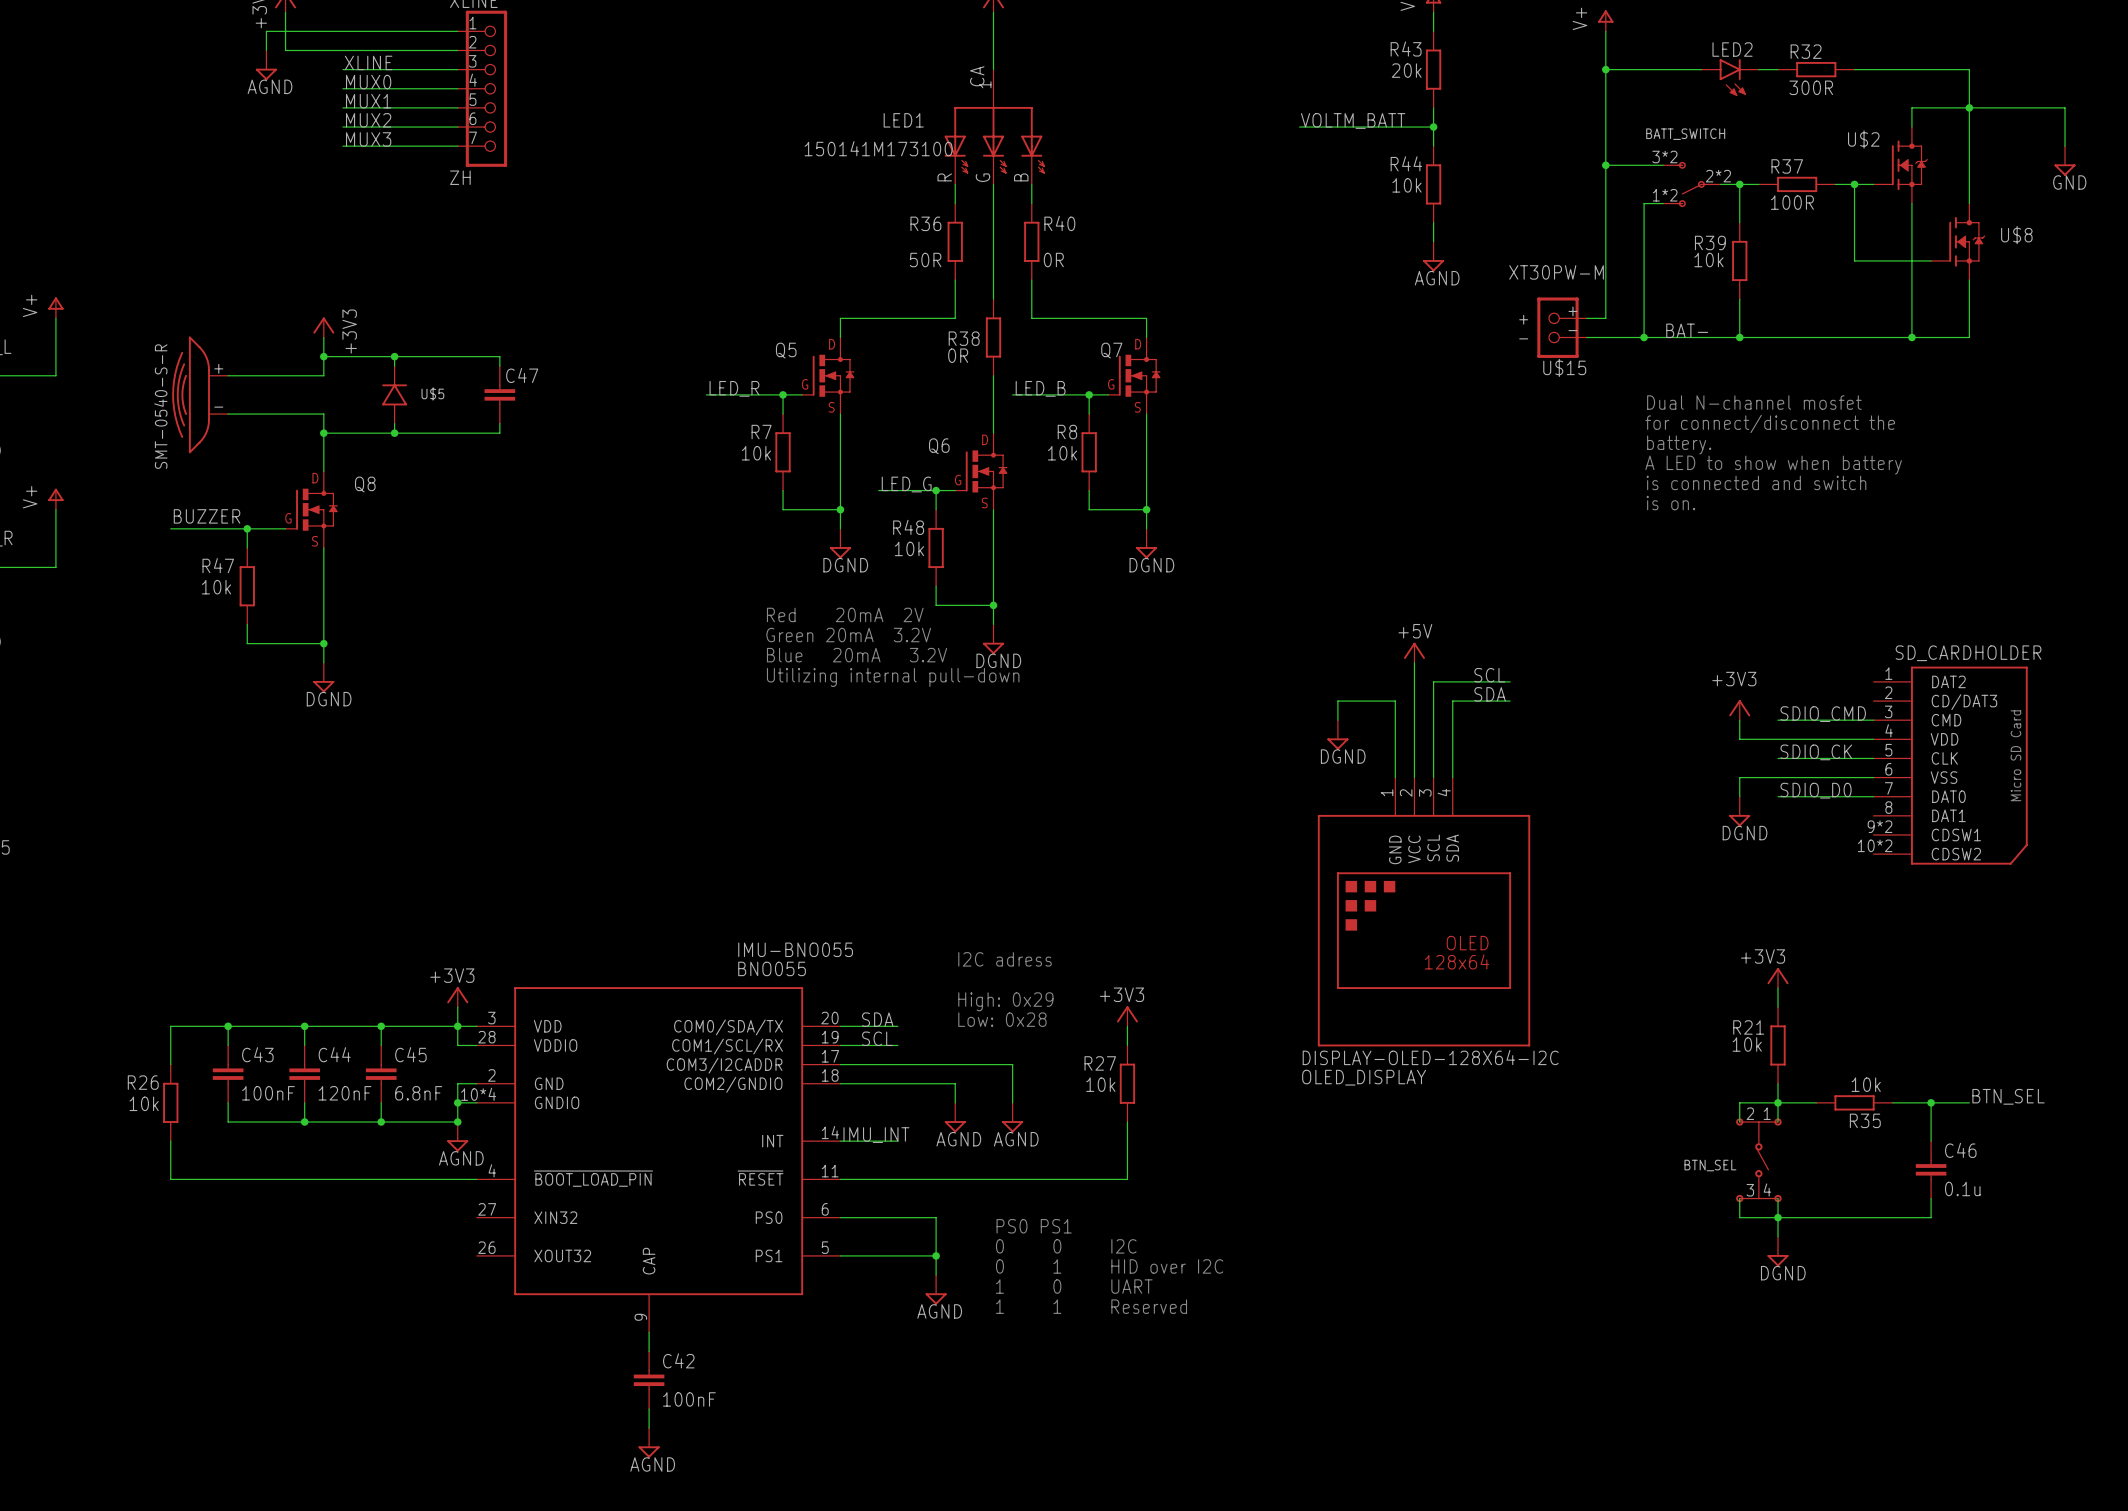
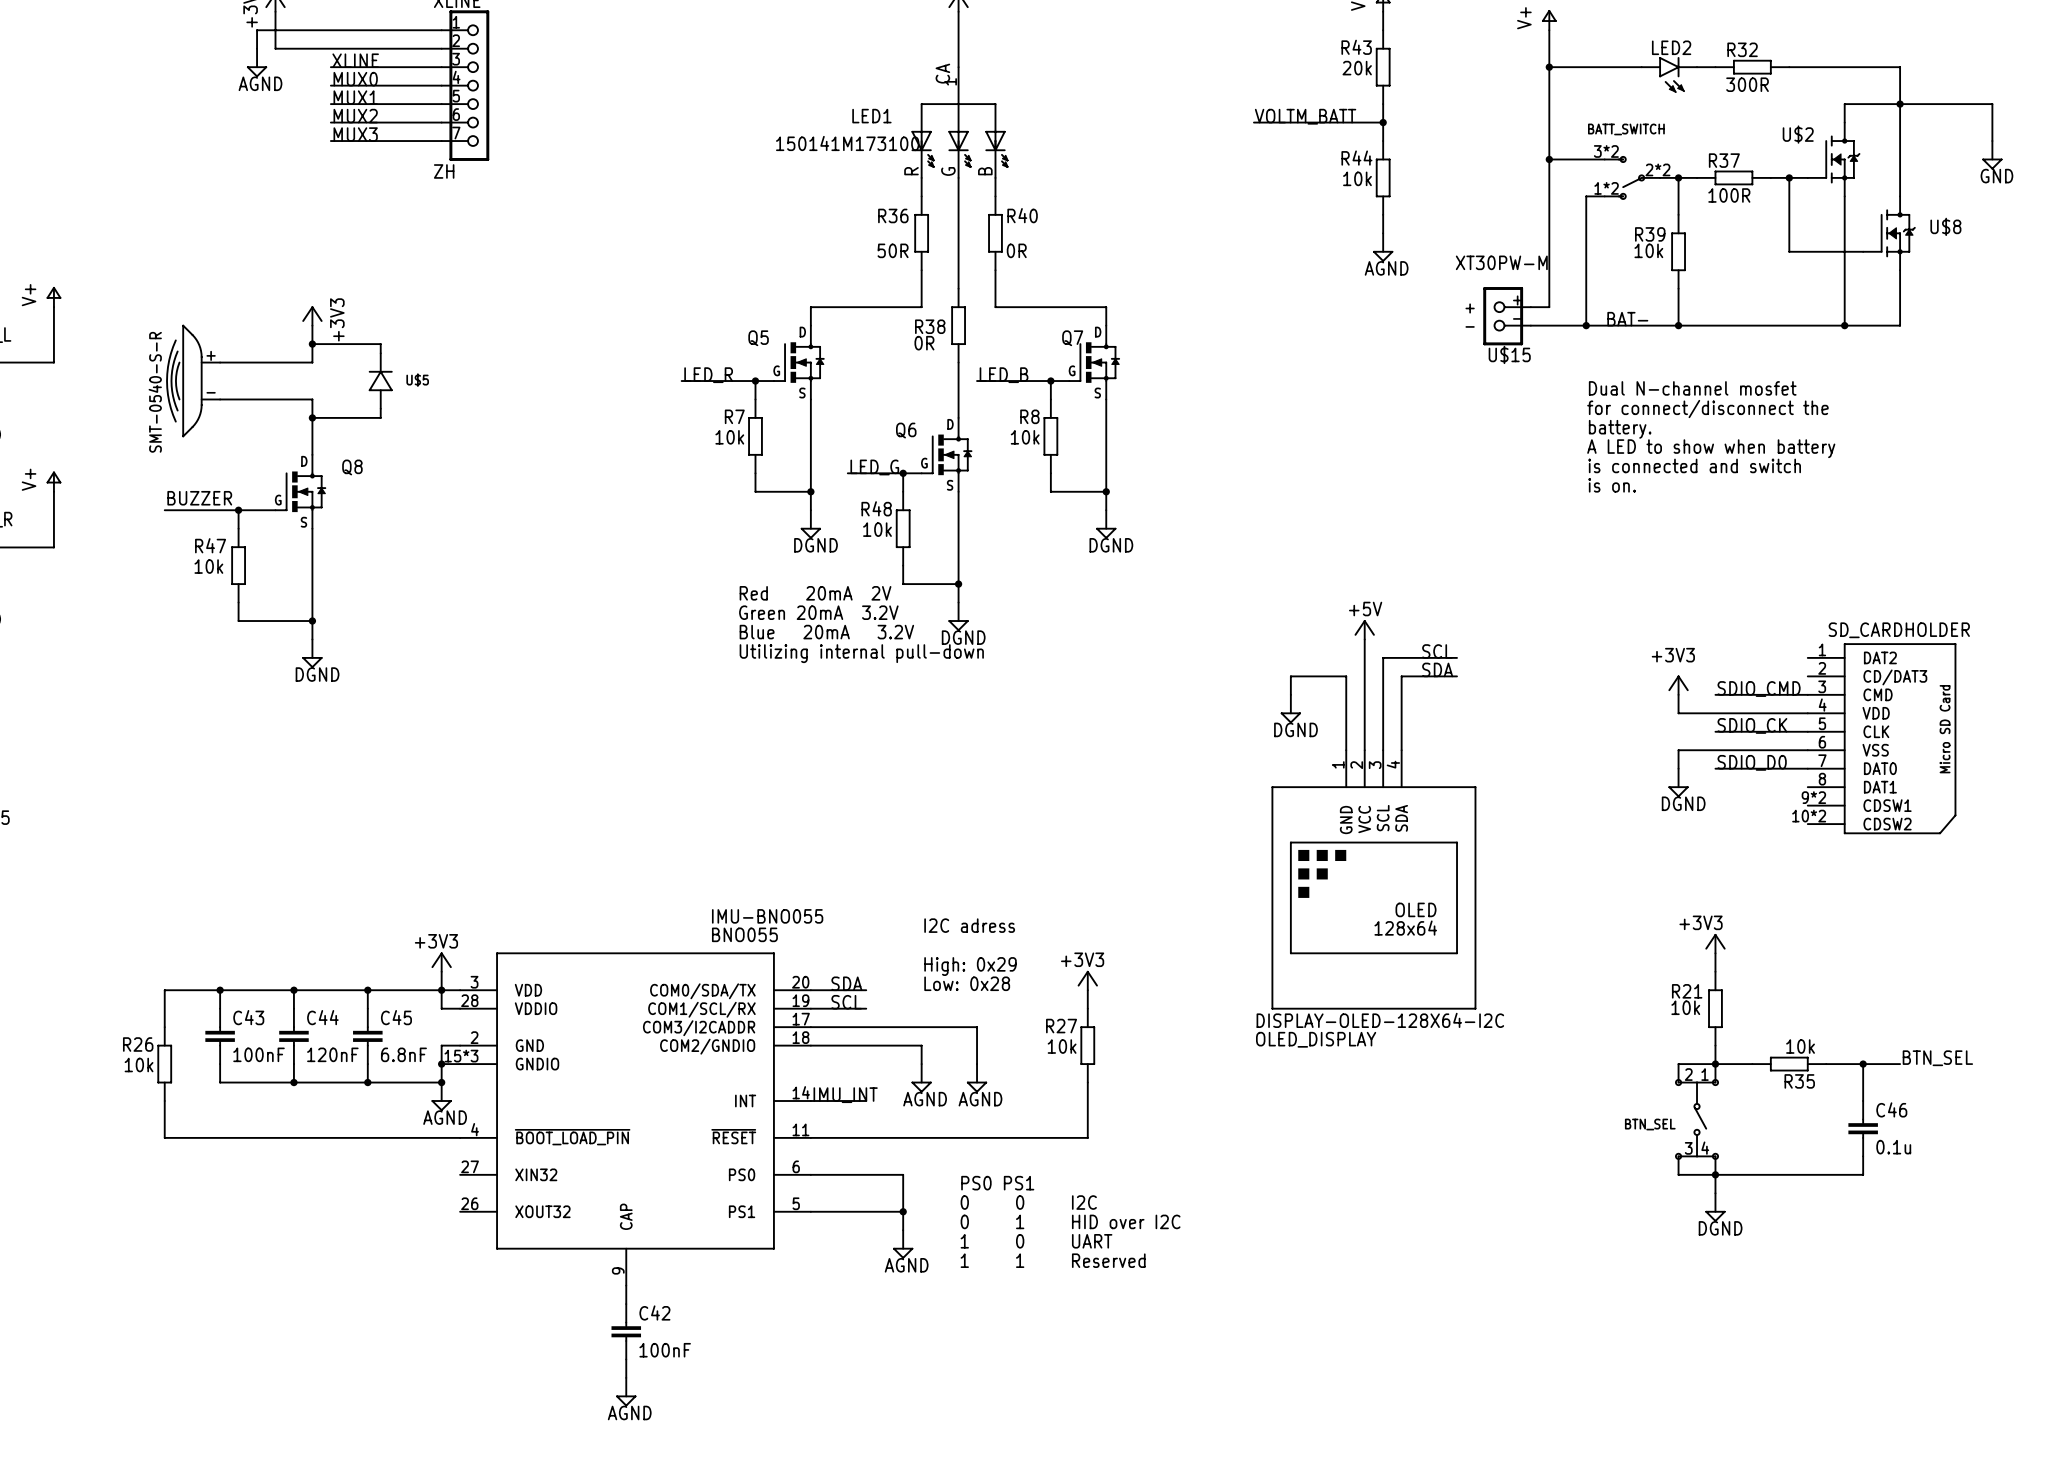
wire: (394, 356) (499, 356) (499, 366) -> none
junction: (394, 356) -> none
C47: (499, 394) -> none
wire: (499, 423) (499, 433) (394, 433) -> none
junction: (394, 433) -> none
IMU-BNO055 pin number: 10*4 (478, 1094) -> 15*3 (461, 1056)

